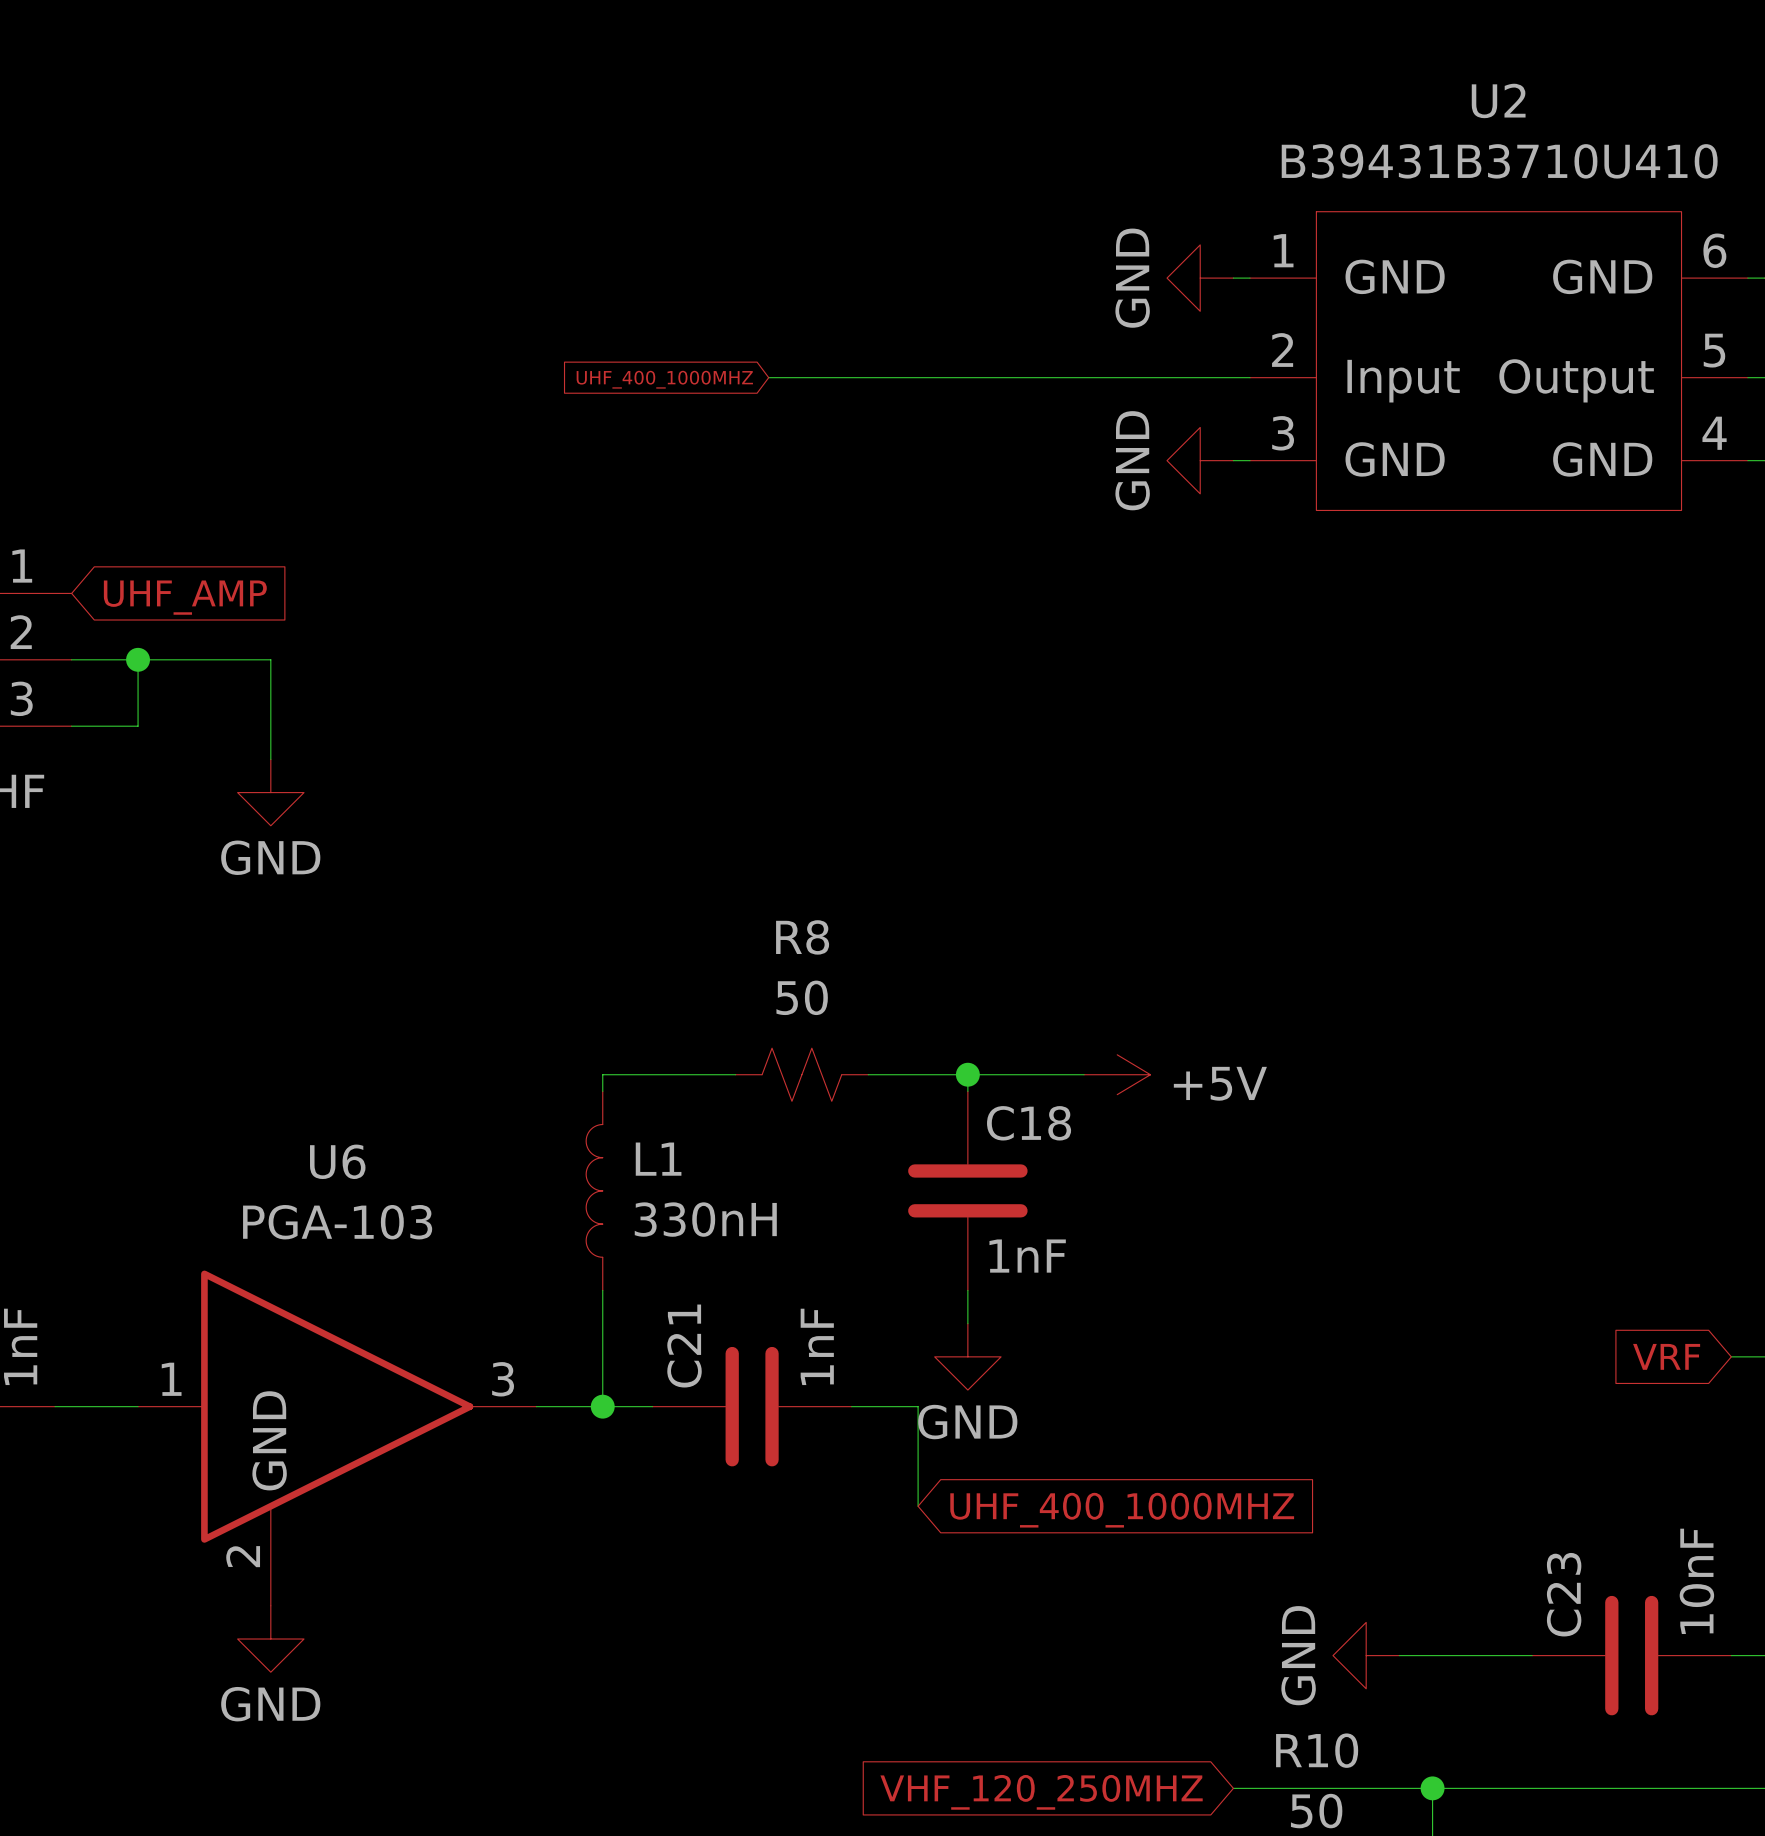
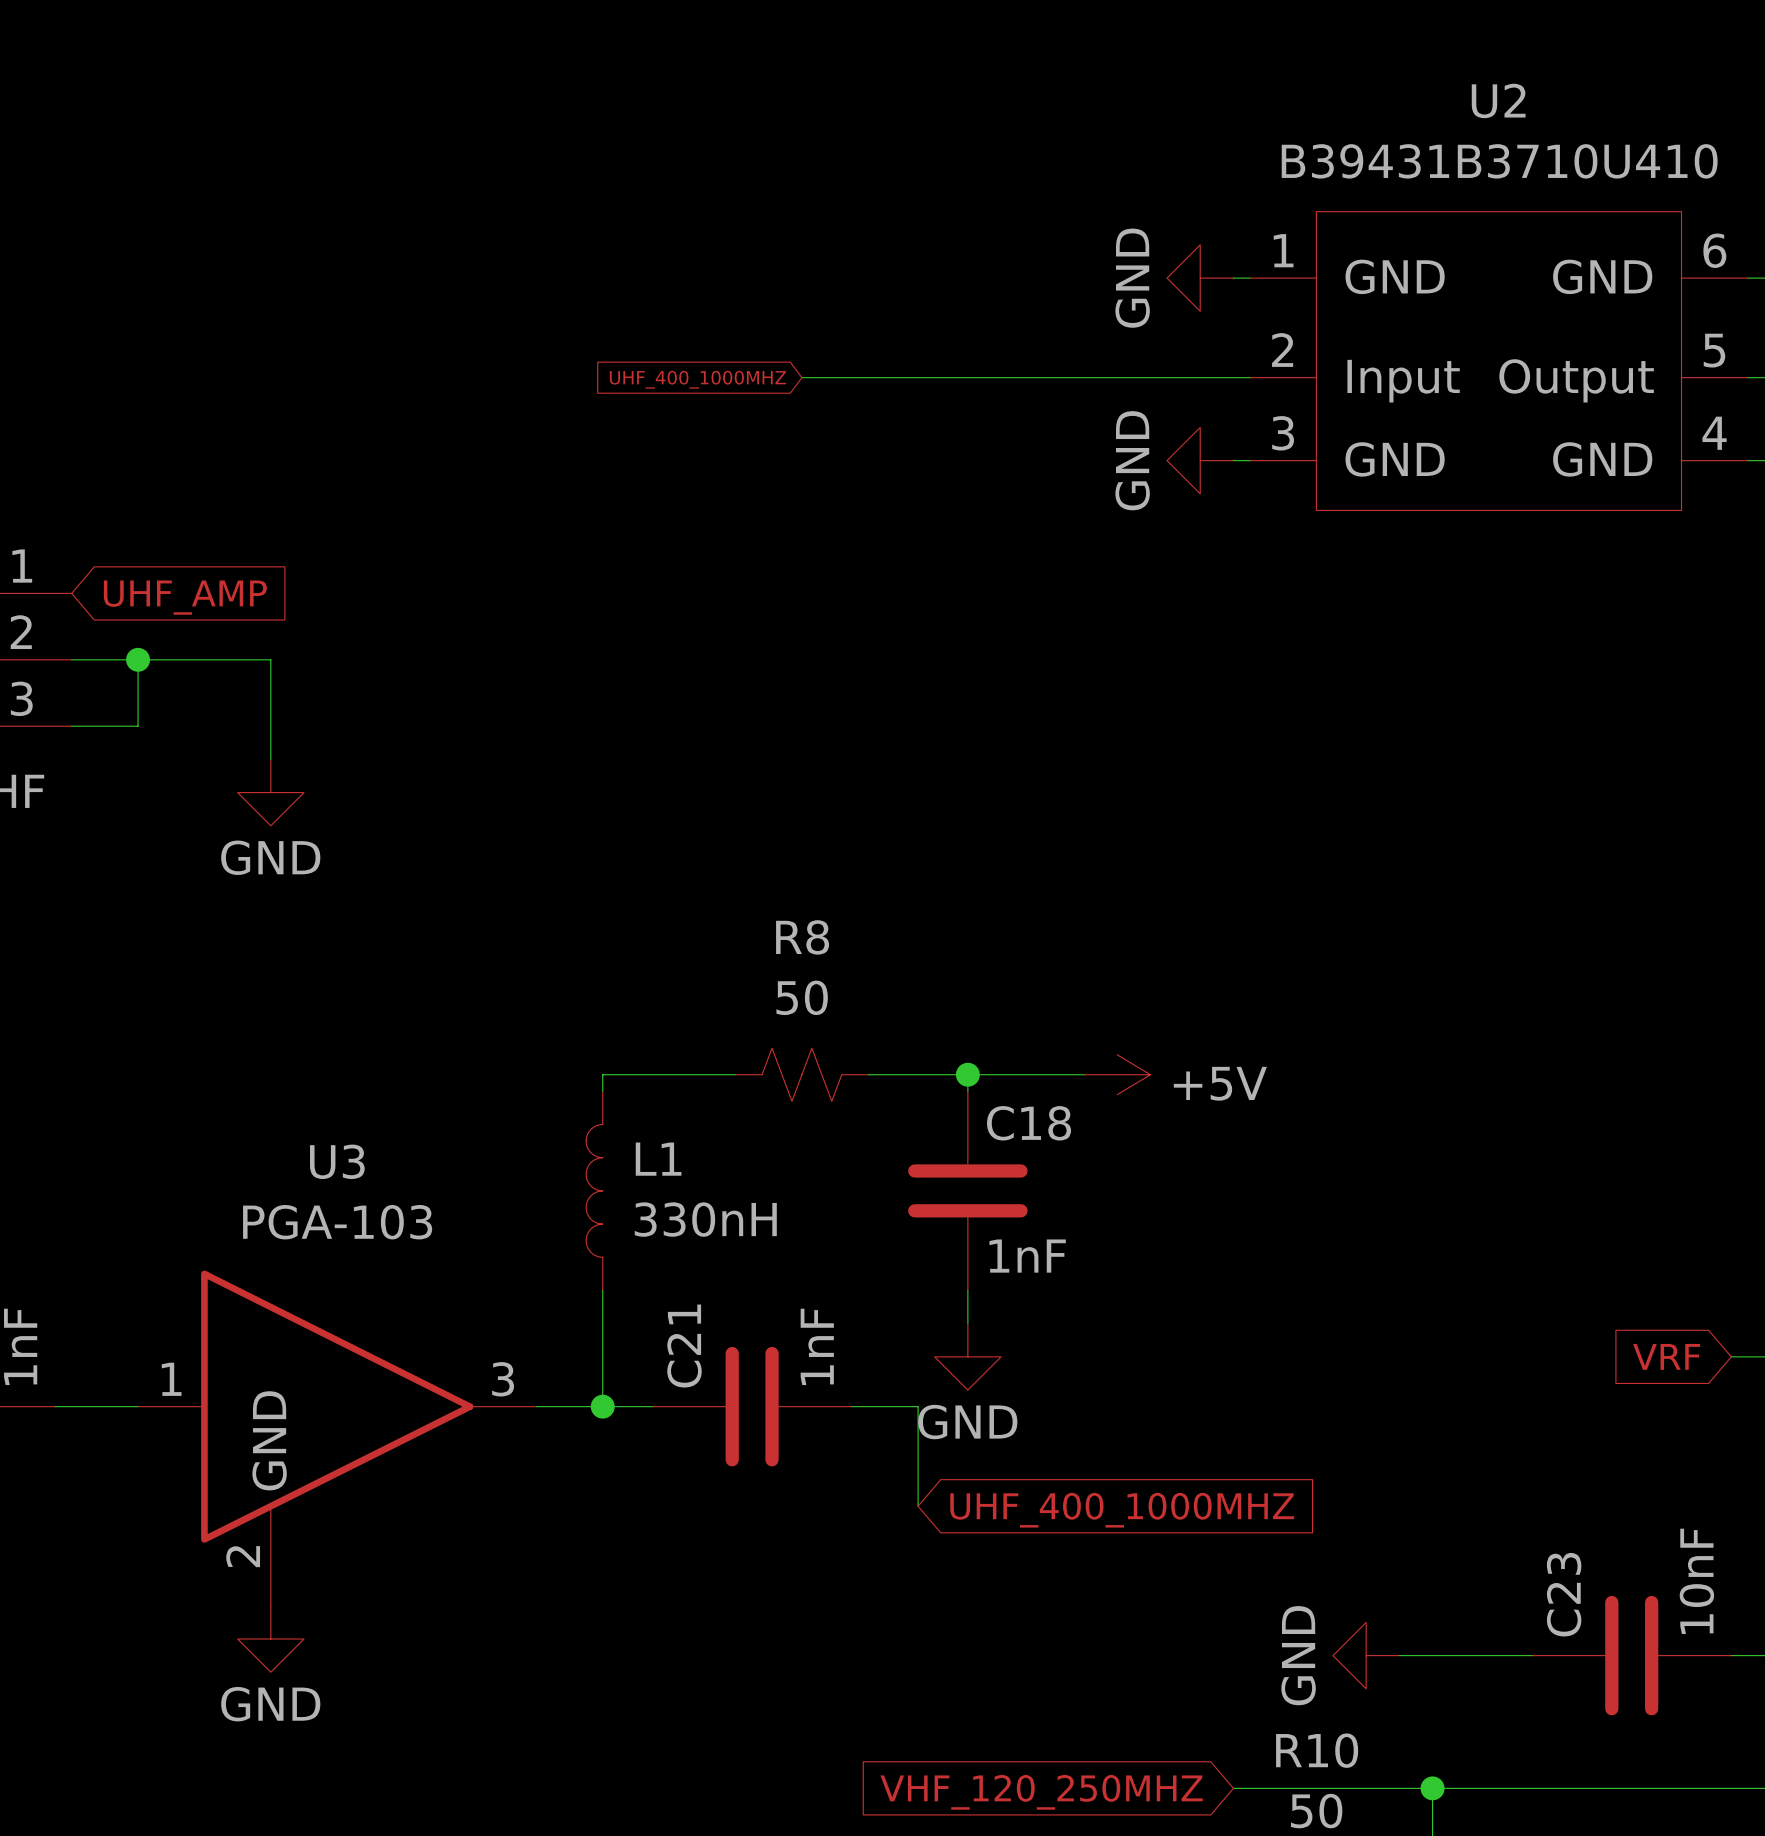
wire: (768, 377) (801, 377) -> none
global label position: UHF_400_1000MHZ (664, 379) -> UHF_400_1000MHZ (698, 379)
U6 name: U6 (337, 1161) -> U3 (337, 1161)

